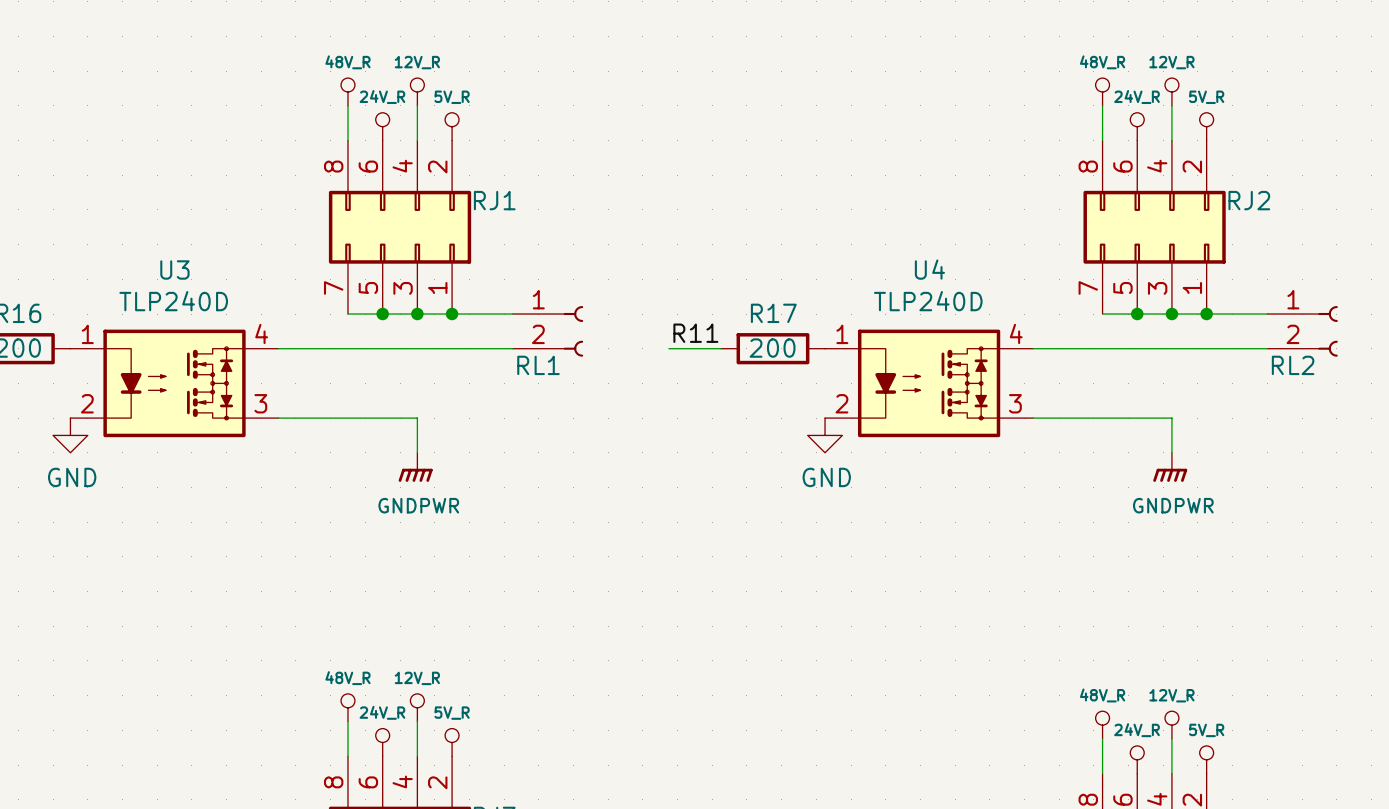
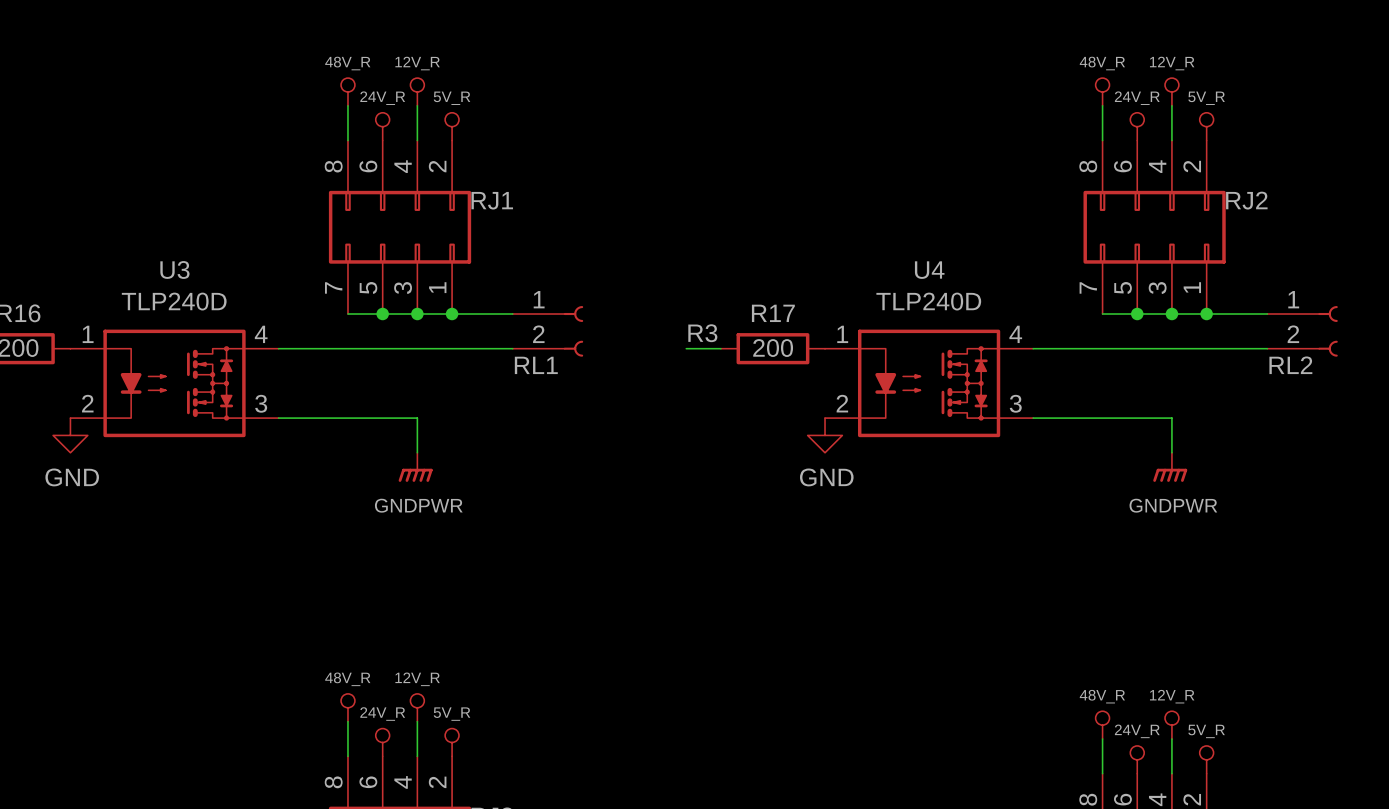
label: R11 (695, 333) -> none
label: none -> R3 (702, 333)
wire: (668, 348) (686, 348) -> none

